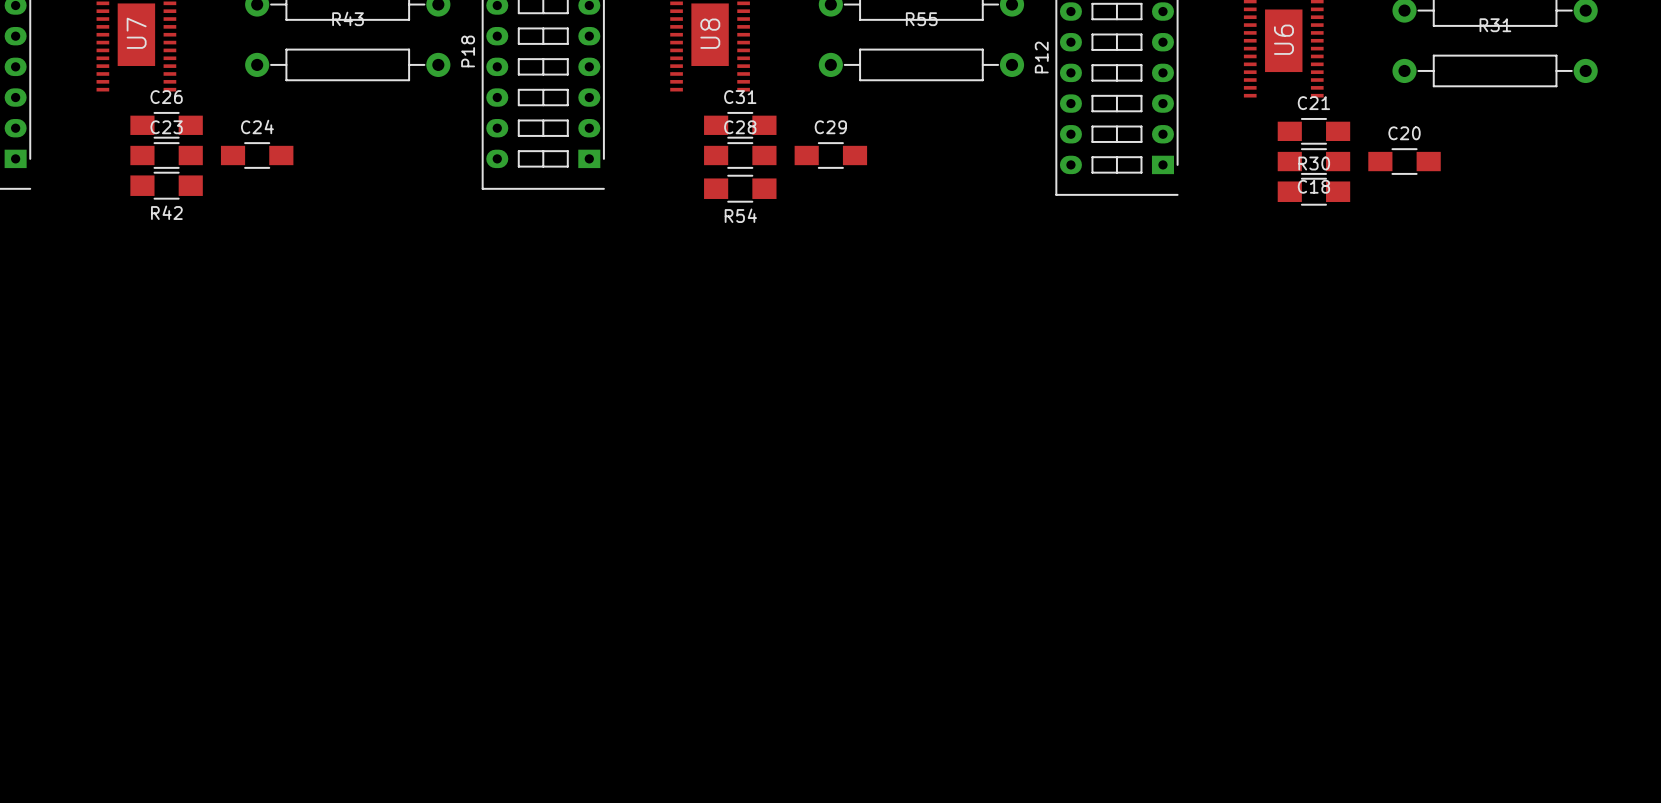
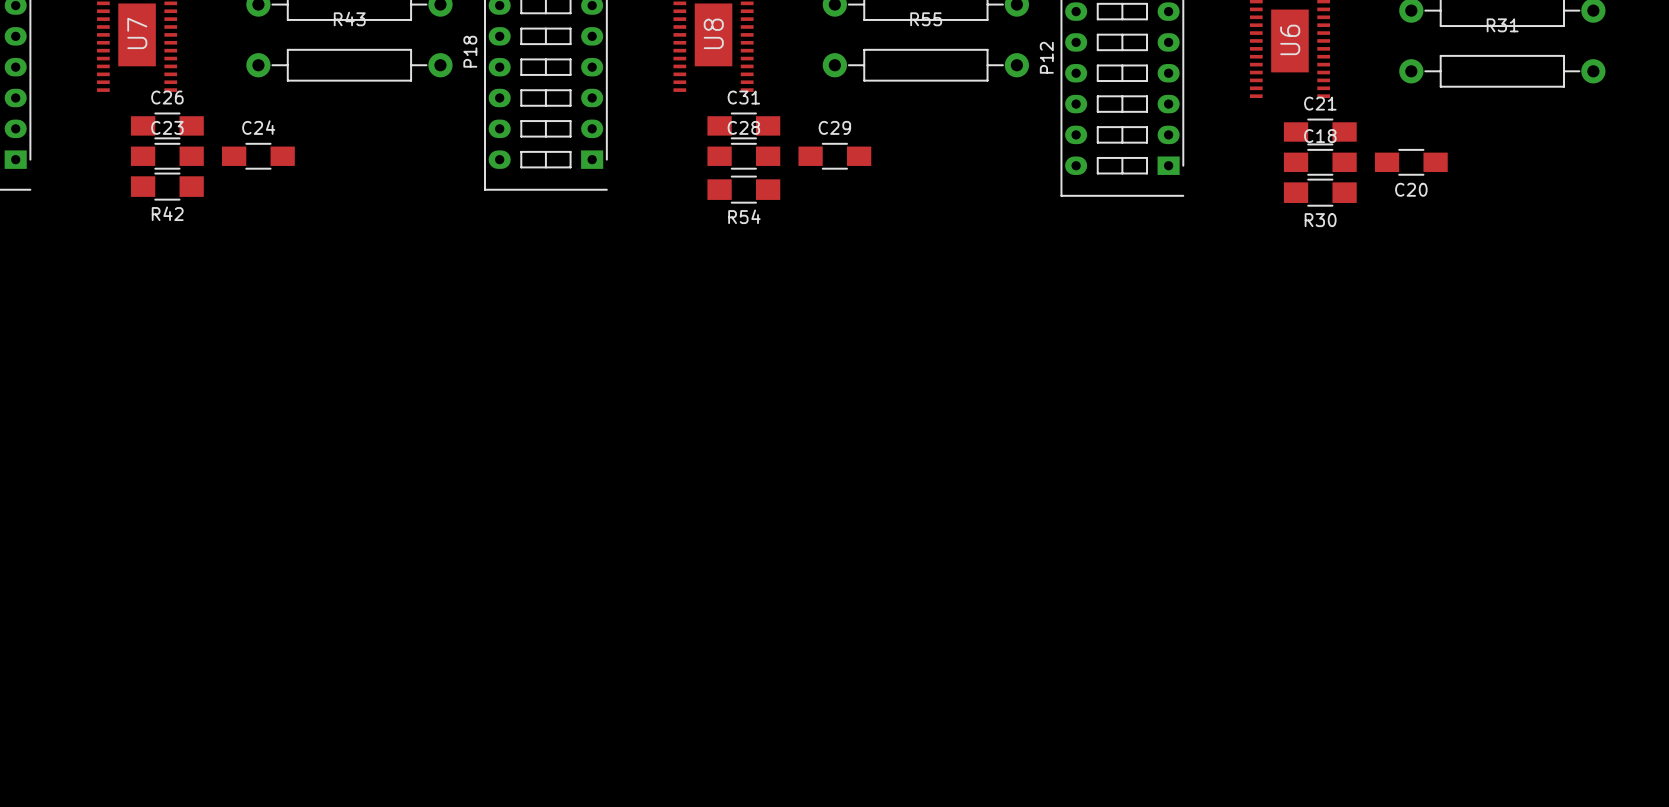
C20 name position: C20 (1404, 133) -> C20 (1411, 189)
R30 name position: R30 (1314, 163) -> R30 (1320, 220)
C18 name position: C18 (1313, 186) -> C18 (1320, 136)

